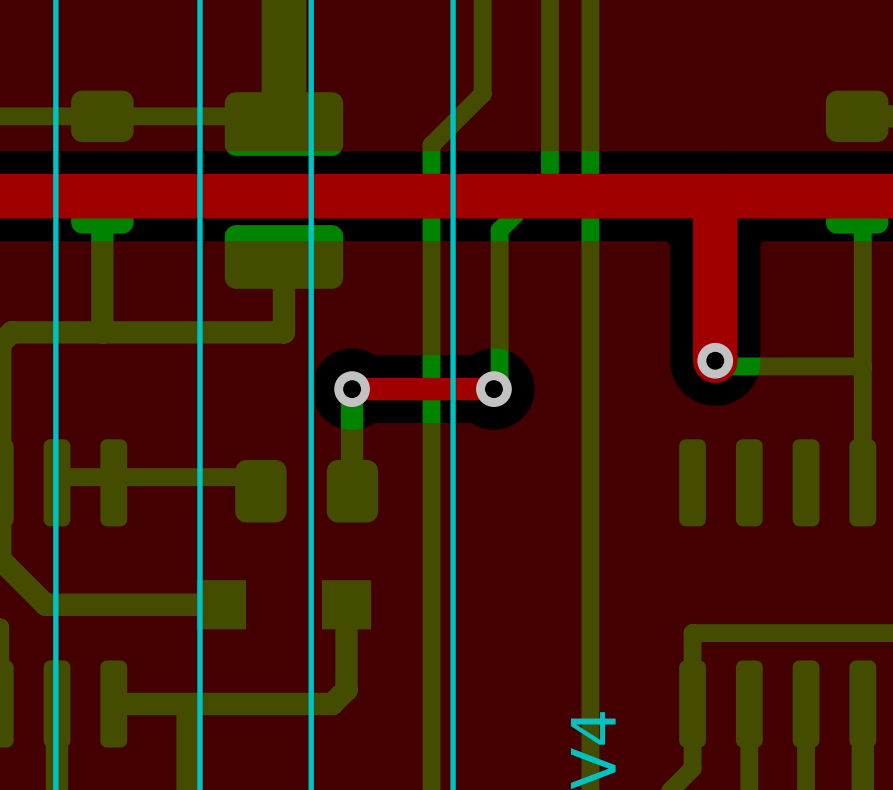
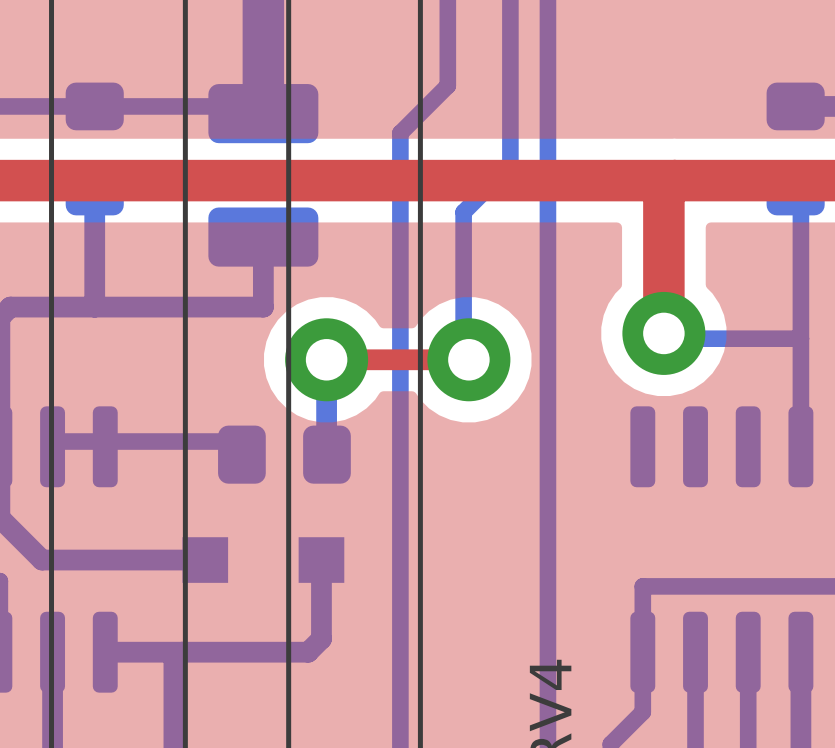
via size: [697, 342, 734, 379] -> [622, 291, 706, 375]
via size: [334, 371, 370, 407] -> [285, 318, 369, 402]
via size: [476, 371, 512, 407] -> [427, 318, 511, 402]

